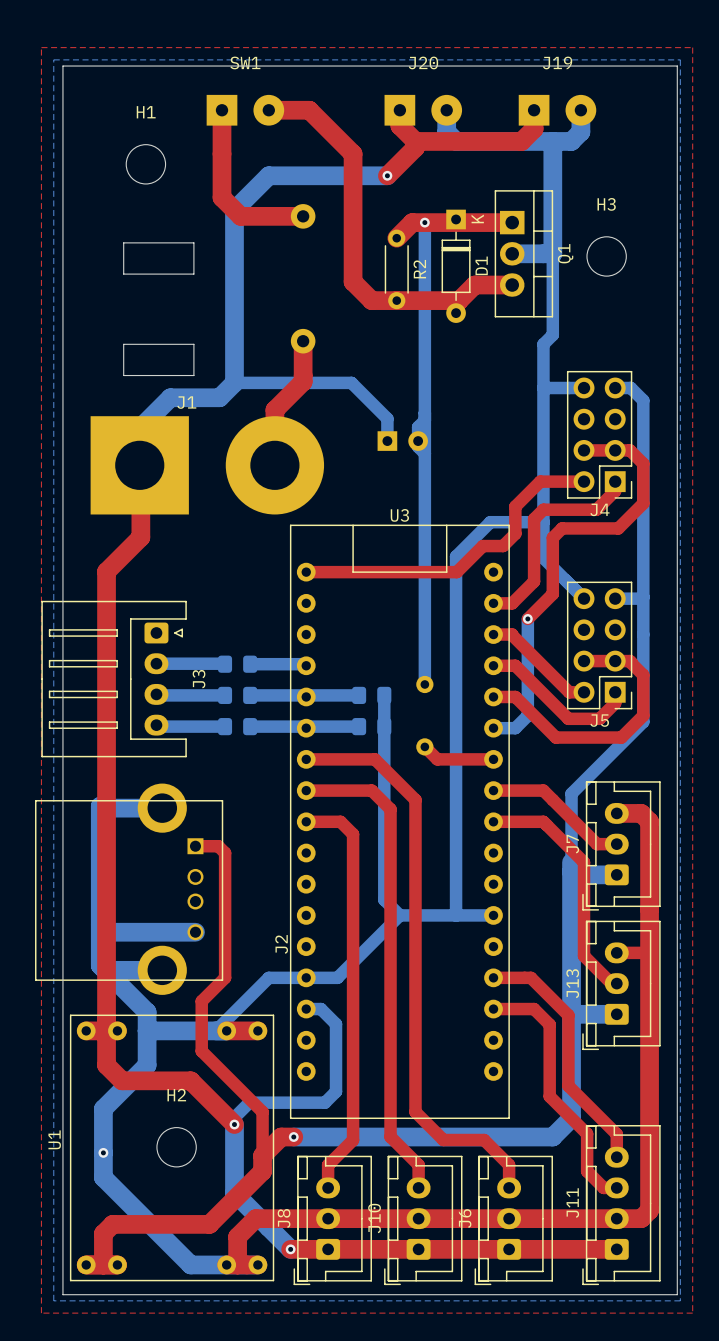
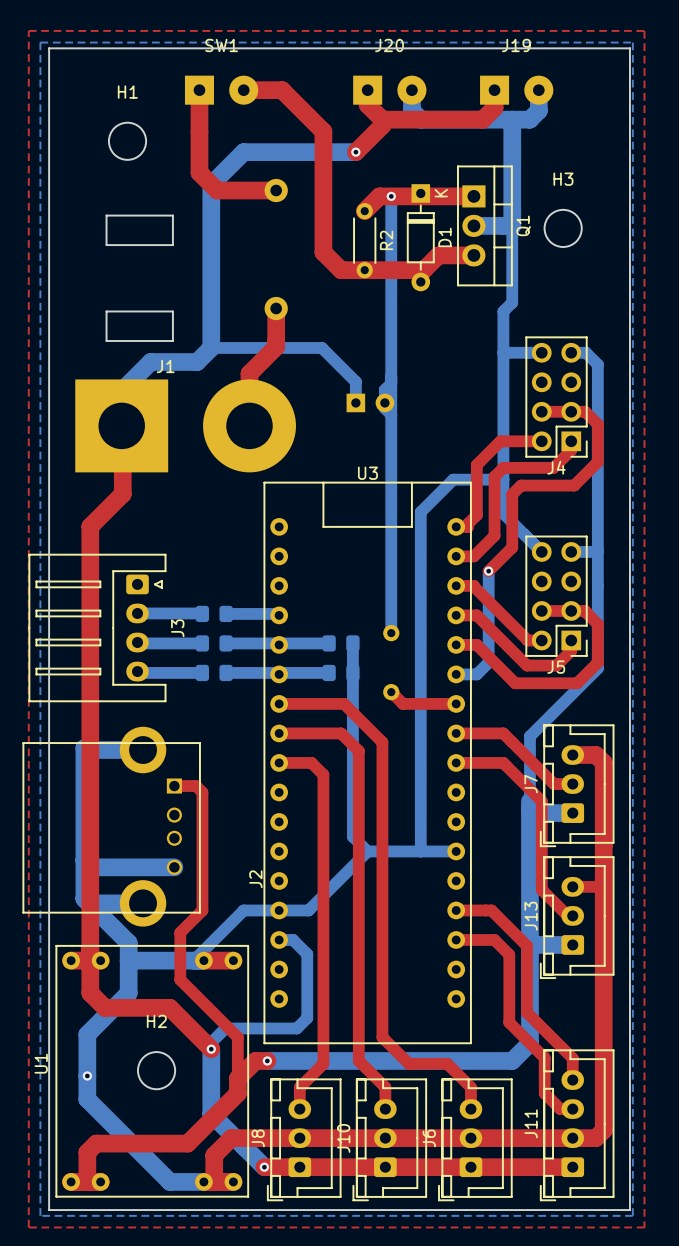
top track: (515, 533) (503, 546) (482, 546) (456, 572) (306, 572) -> (476, 490) (476, 515) (468, 523) (468, 526) (456, 526)

